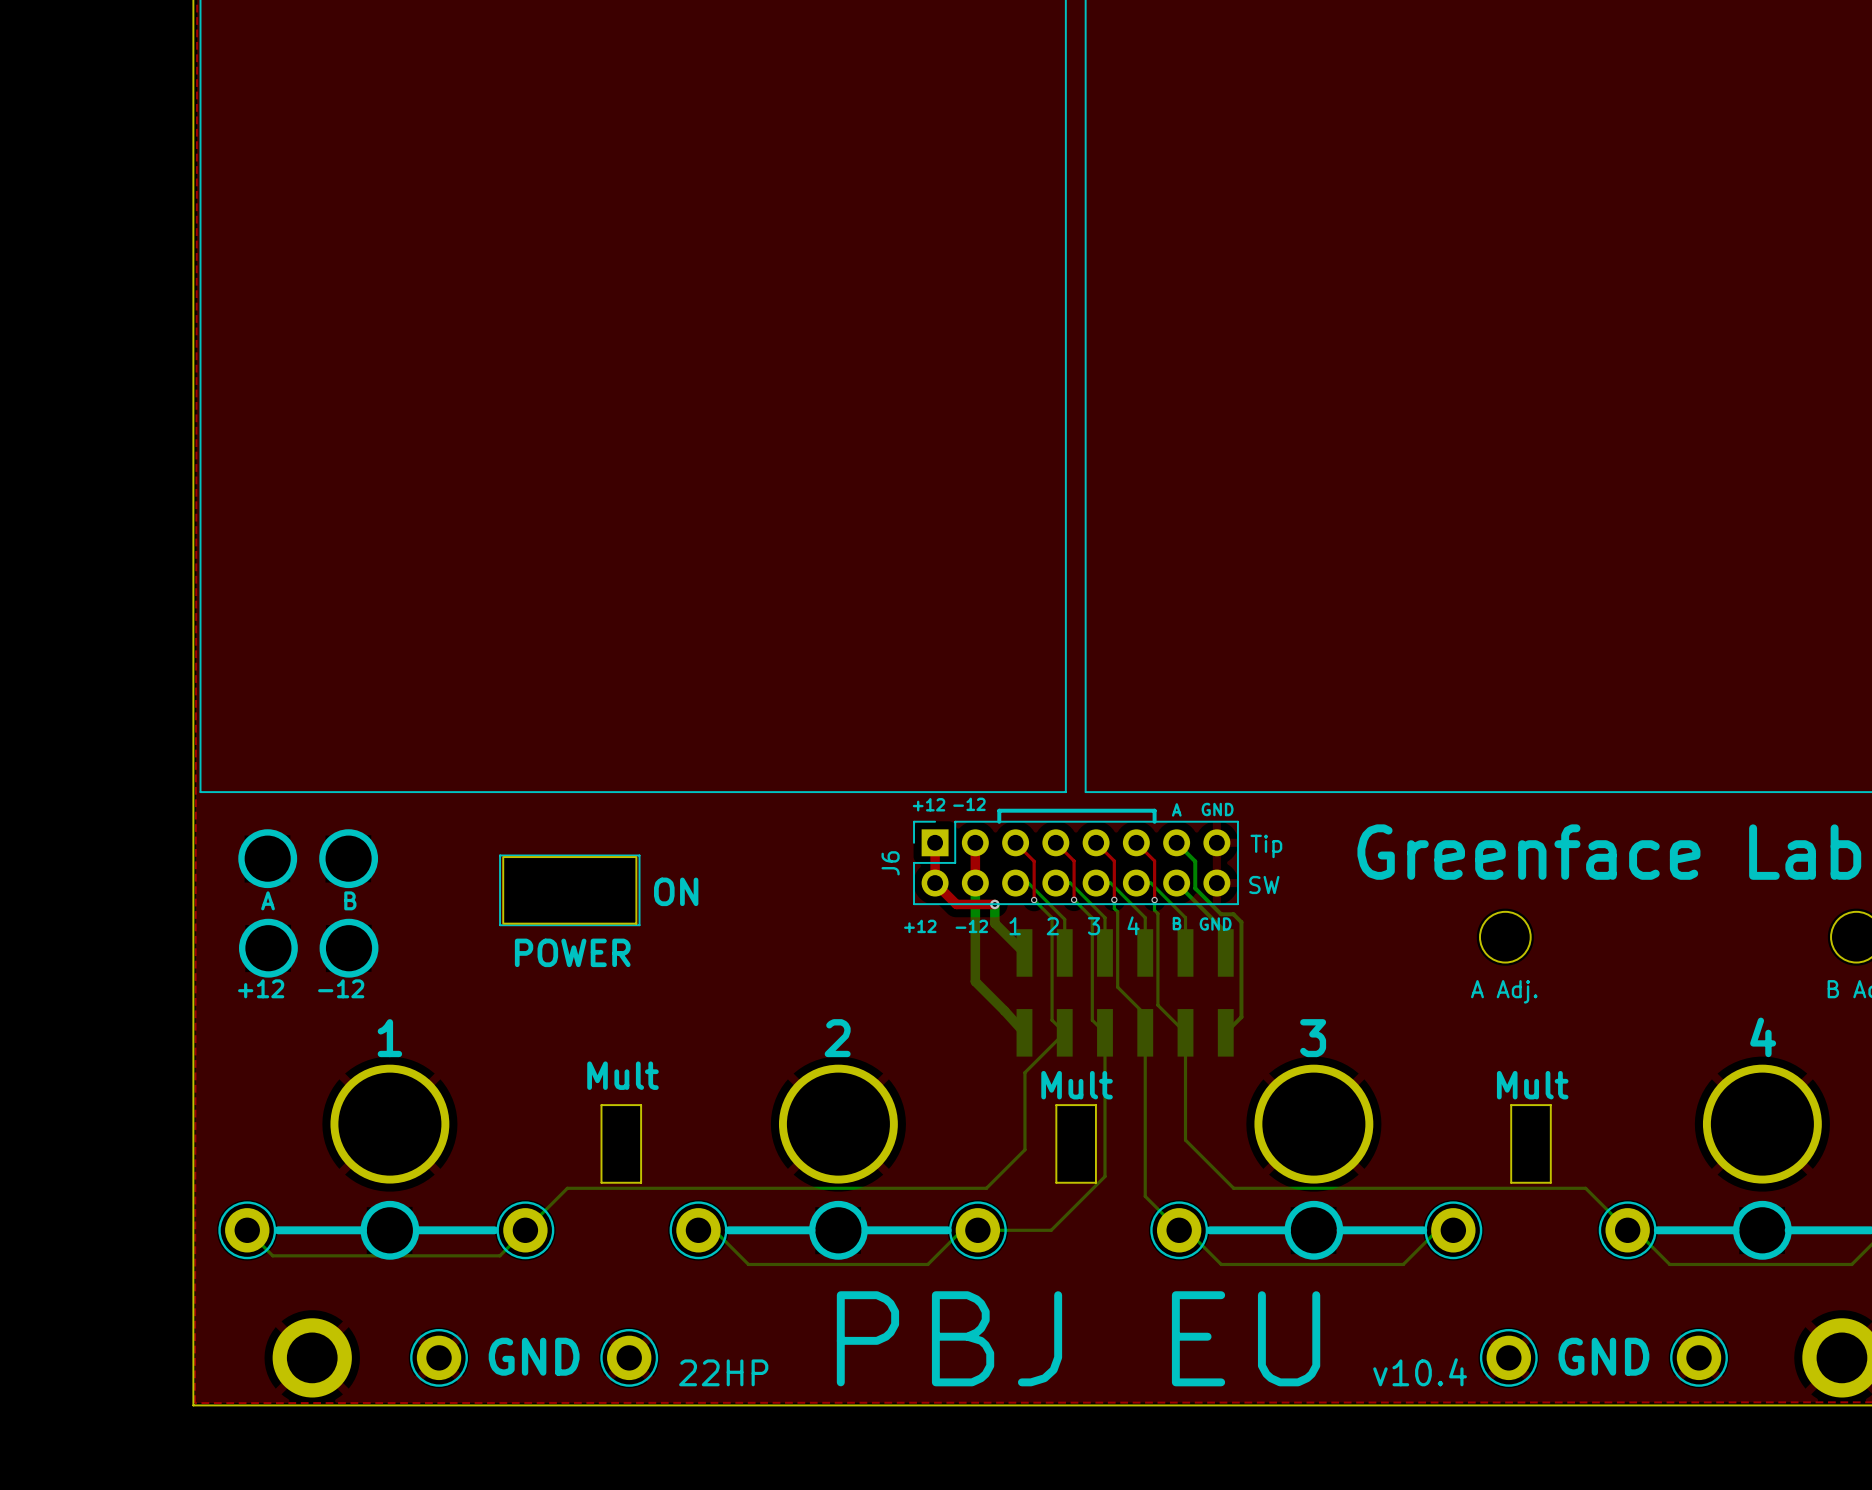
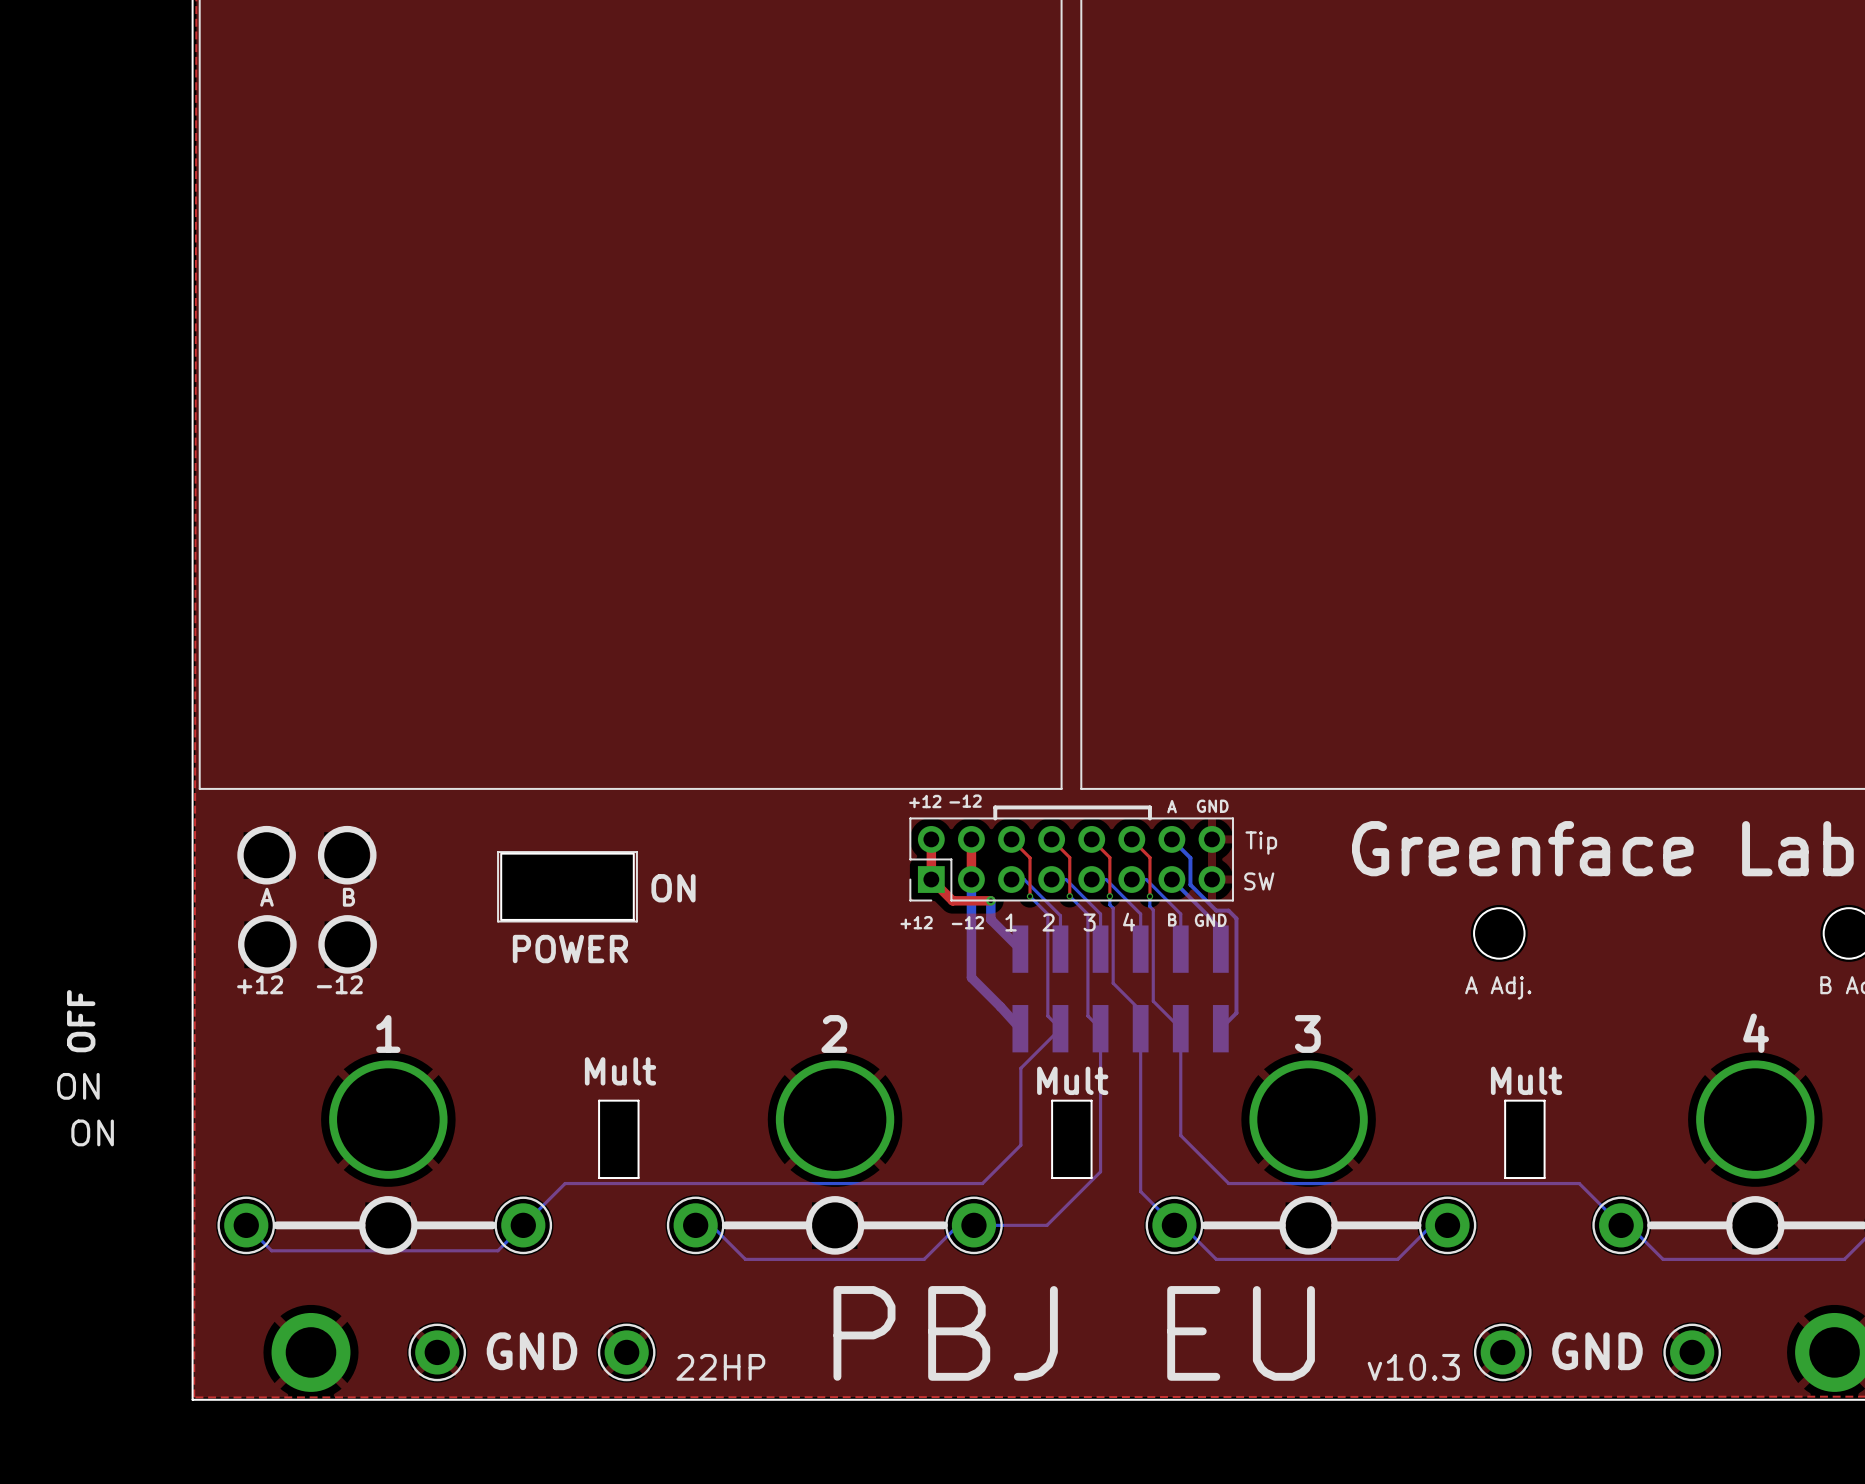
J6: (1075, 862) -> none
part: none -> (1071, 859)
text: none -> OFF (81, 1021)
text: none -> ON (78, 1086)
text: none -> ON (92, 1132)
text: v10.4 (1420, 1372) -> v10.3 (1413, 1367)

